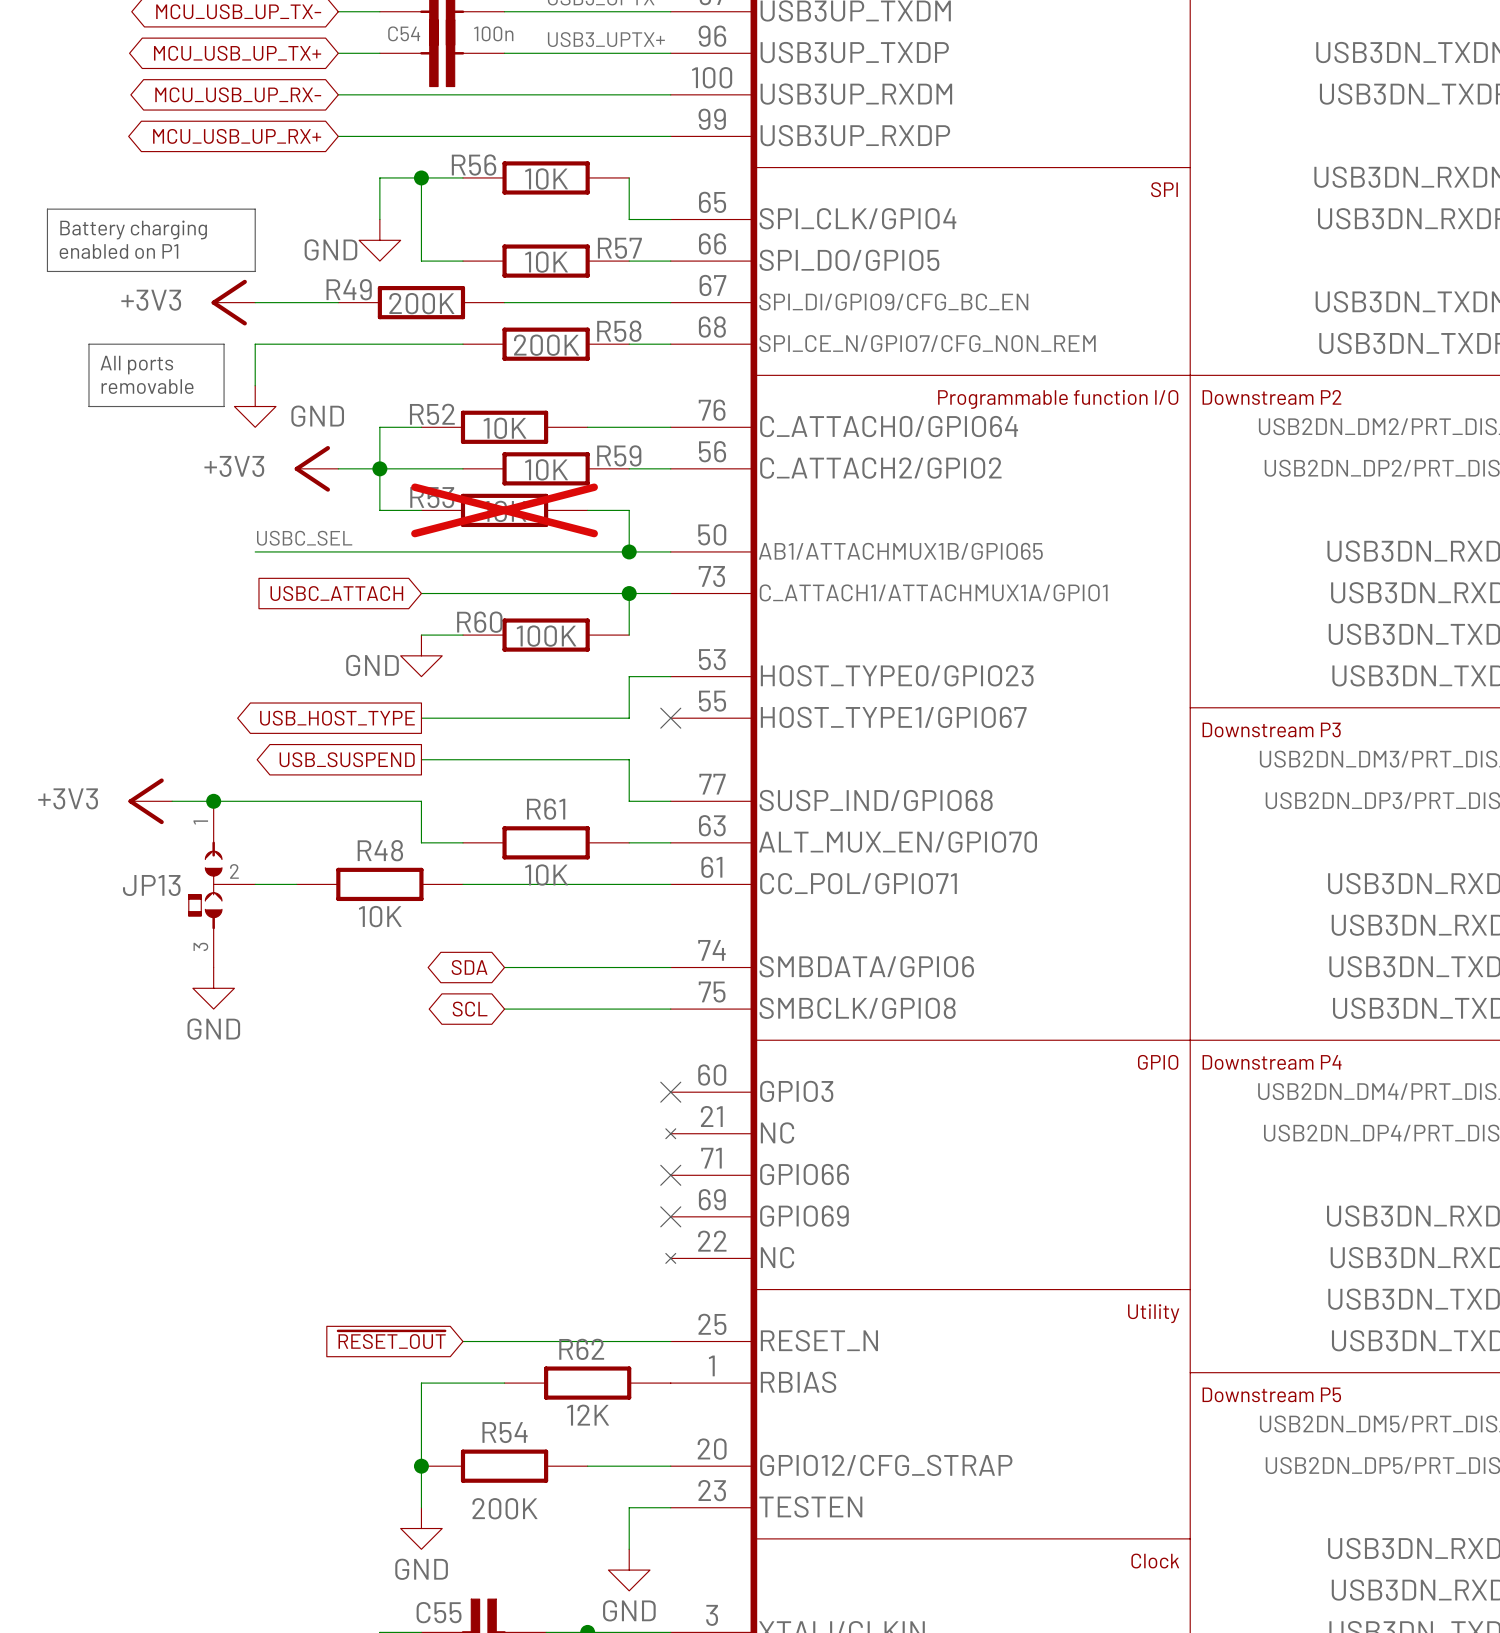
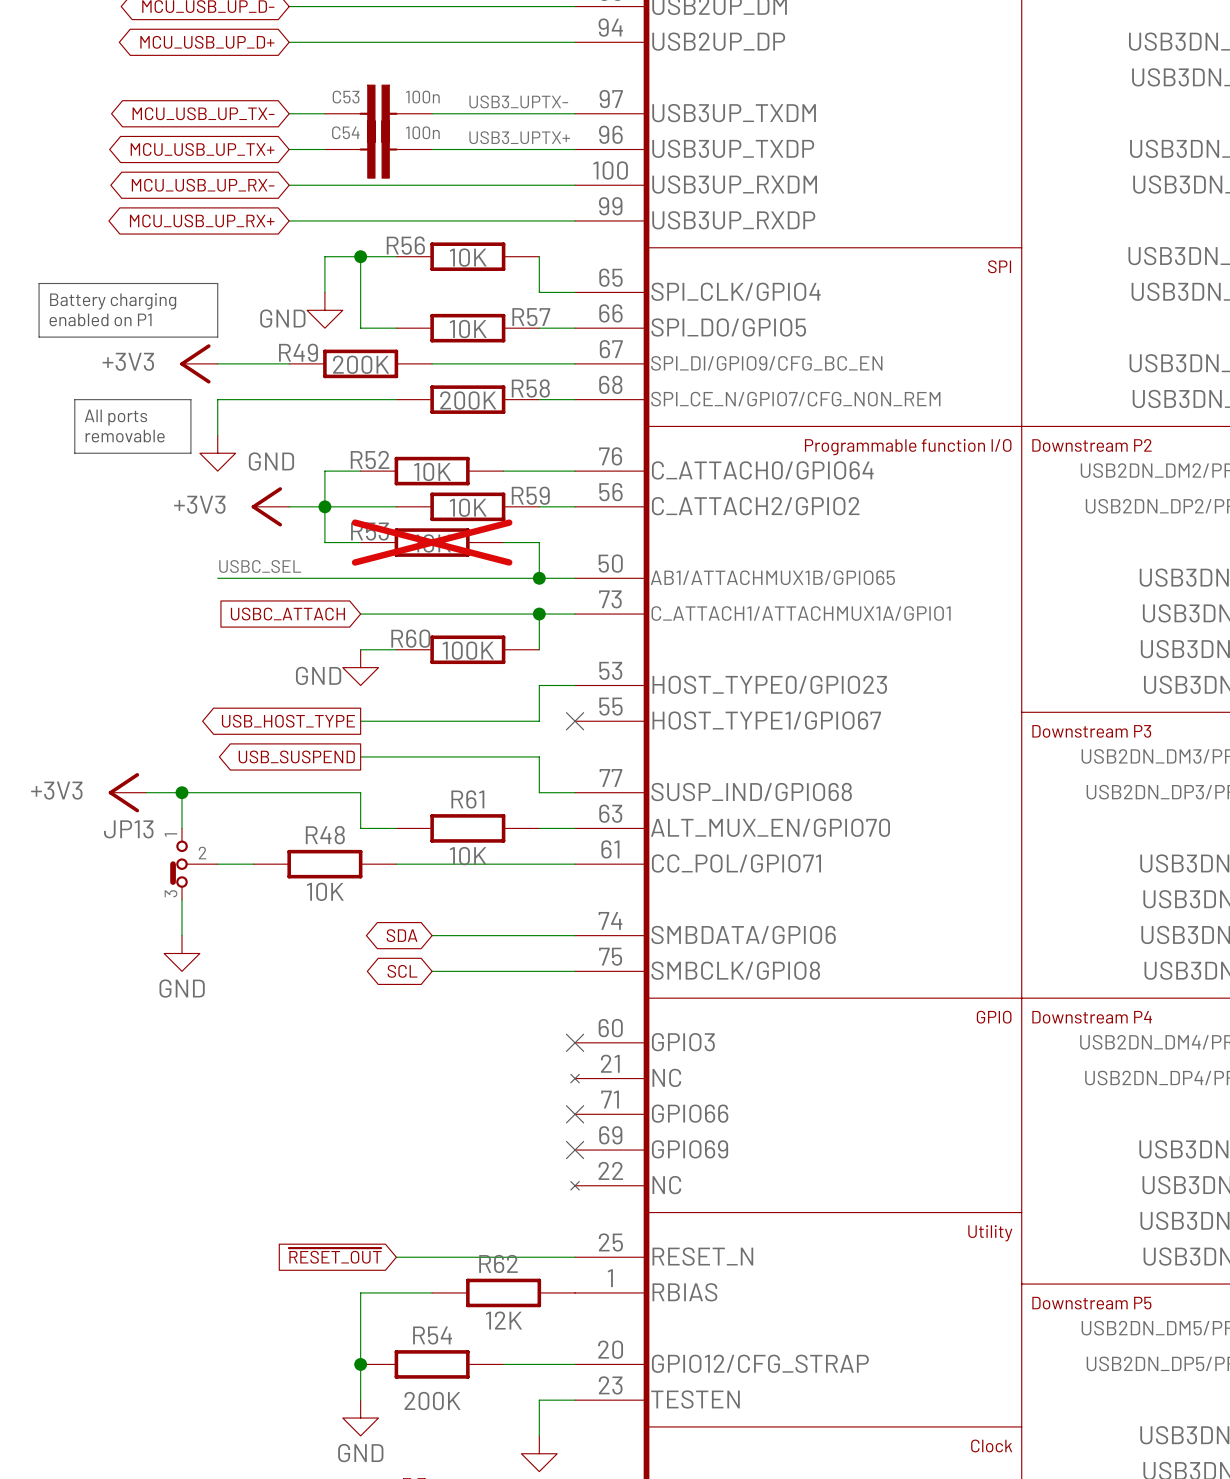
JP13 symbol: [188, 801, 256, 968] -> [170, 828, 218, 900]
JP13 name position: JP13 (151, 885) -> JP13 (128, 829)

